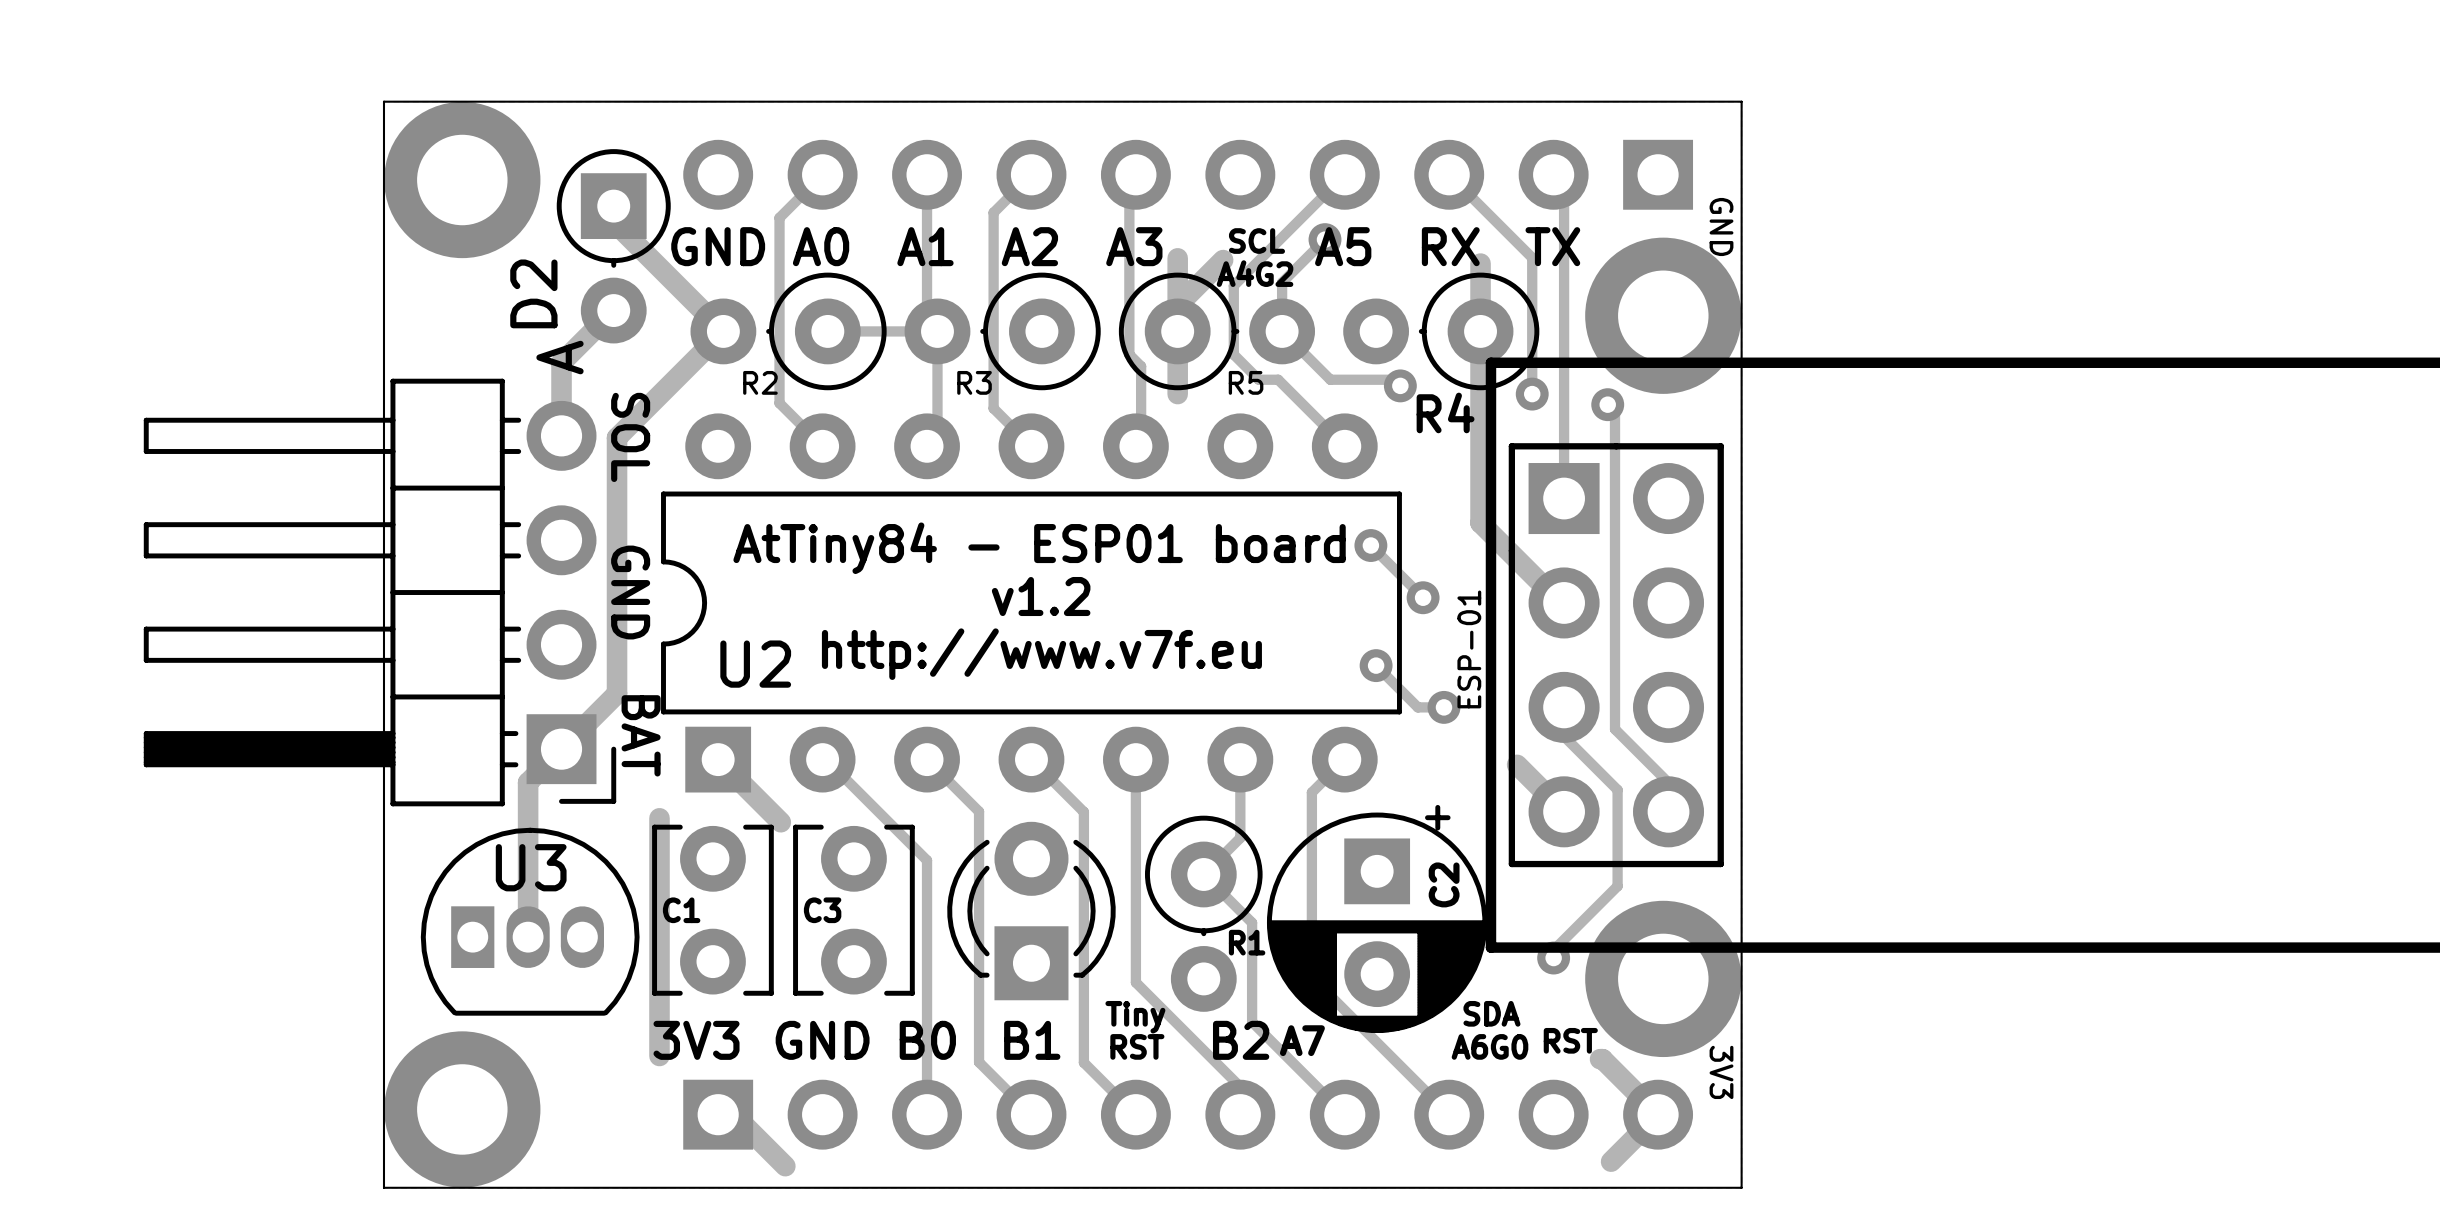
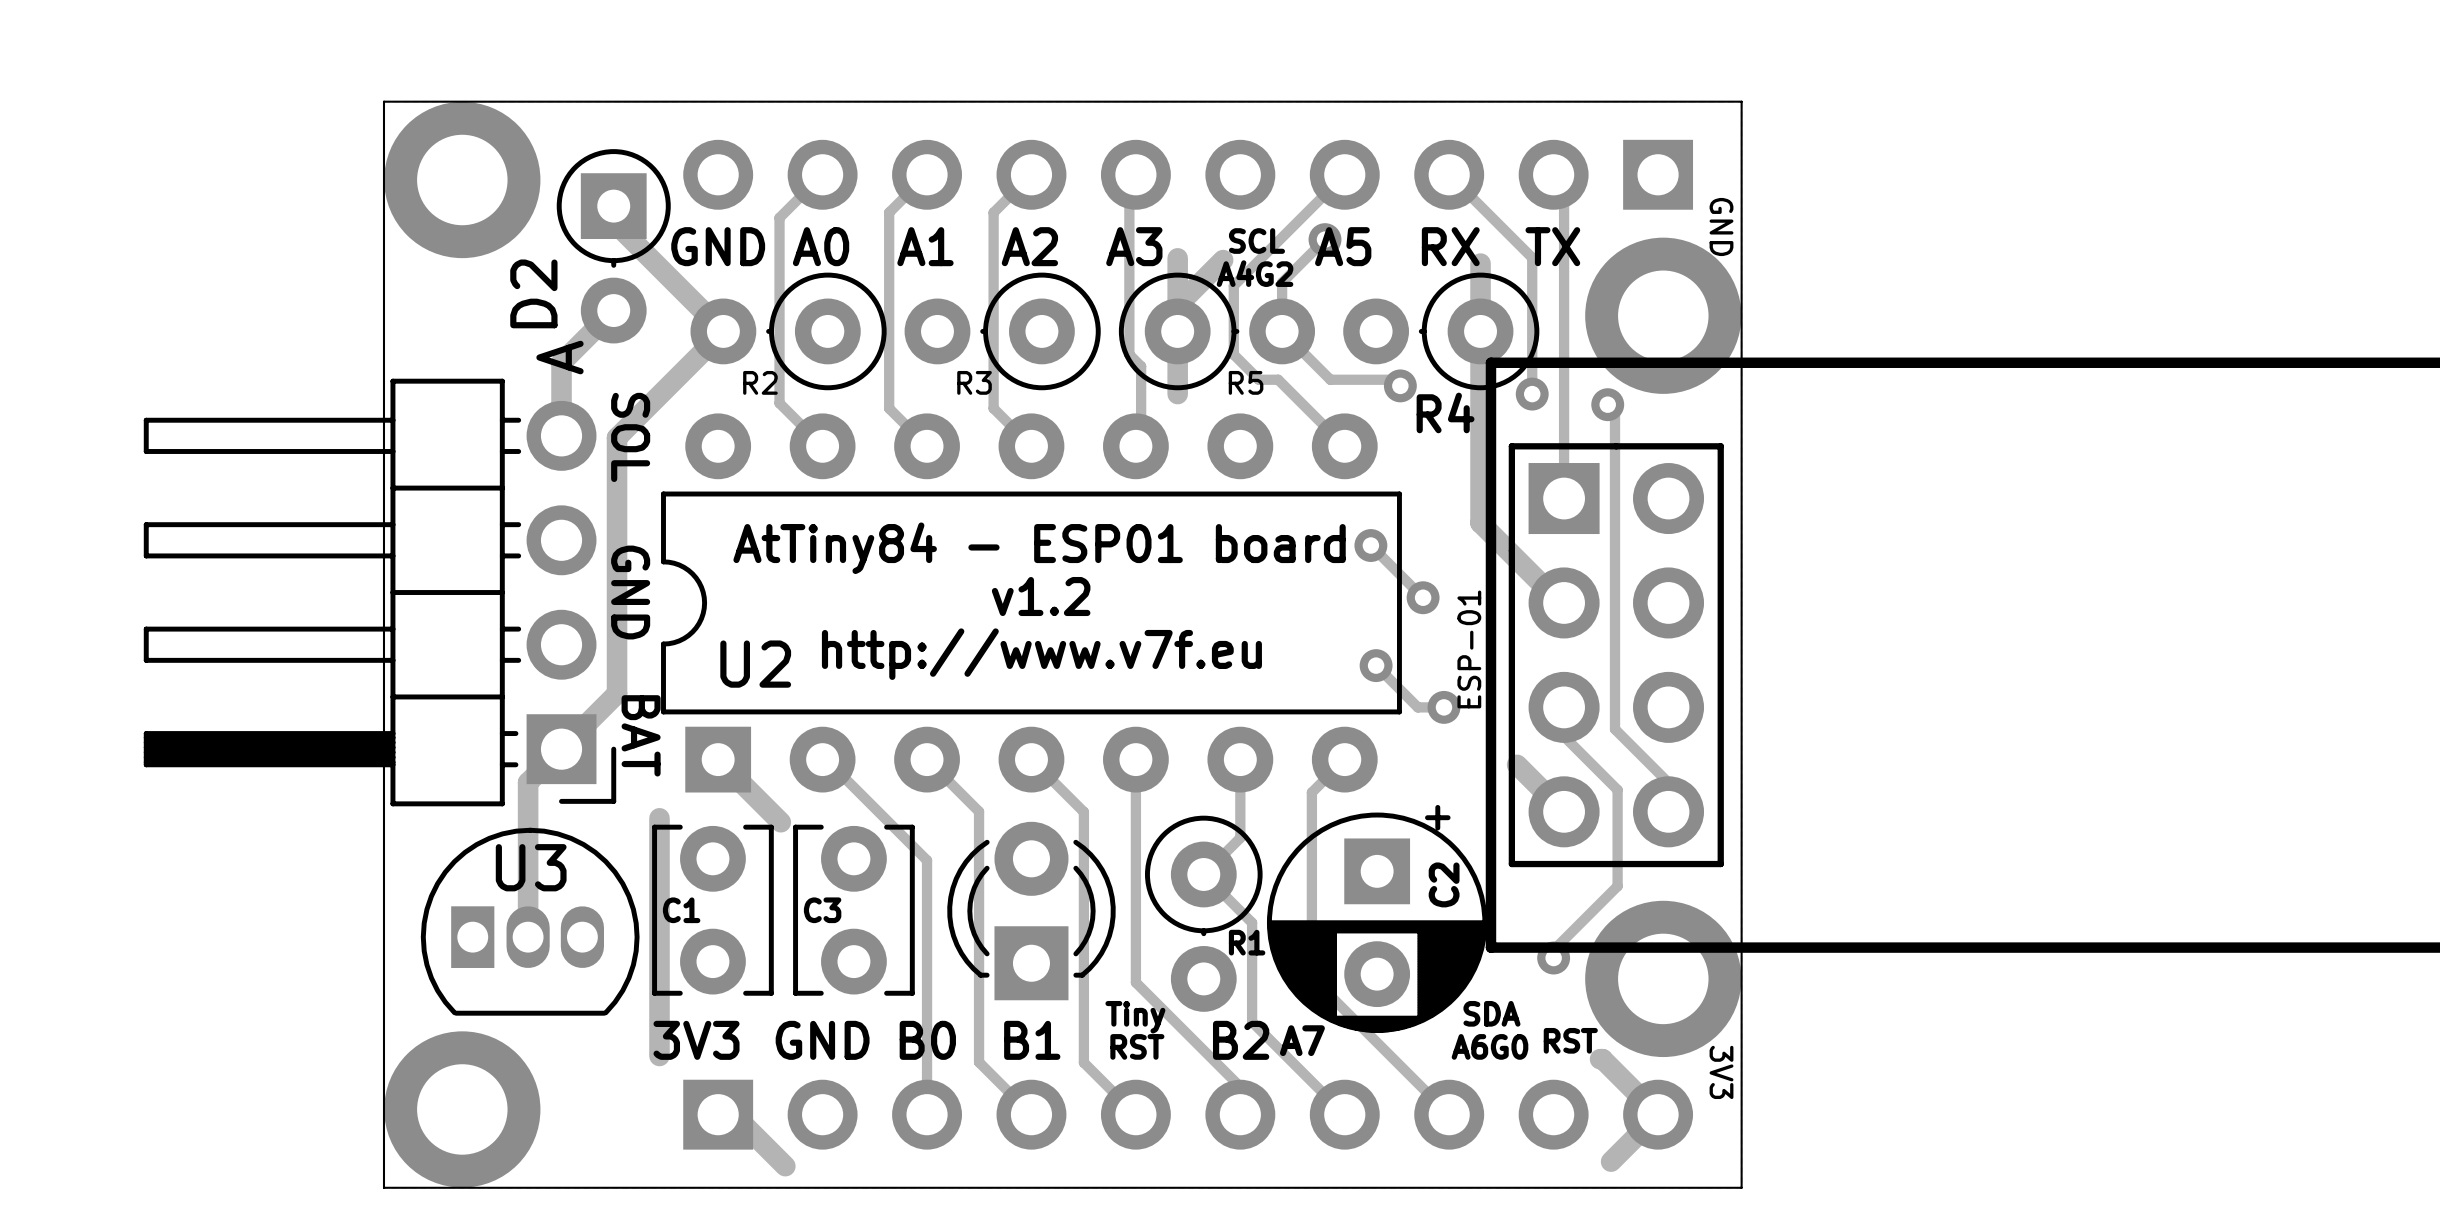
track: (927, 174) (927, 320) -> (927, 174) (889, 212) (889, 408) (927, 446)
track: (827, 331) (937, 331) (937, 435) -> none

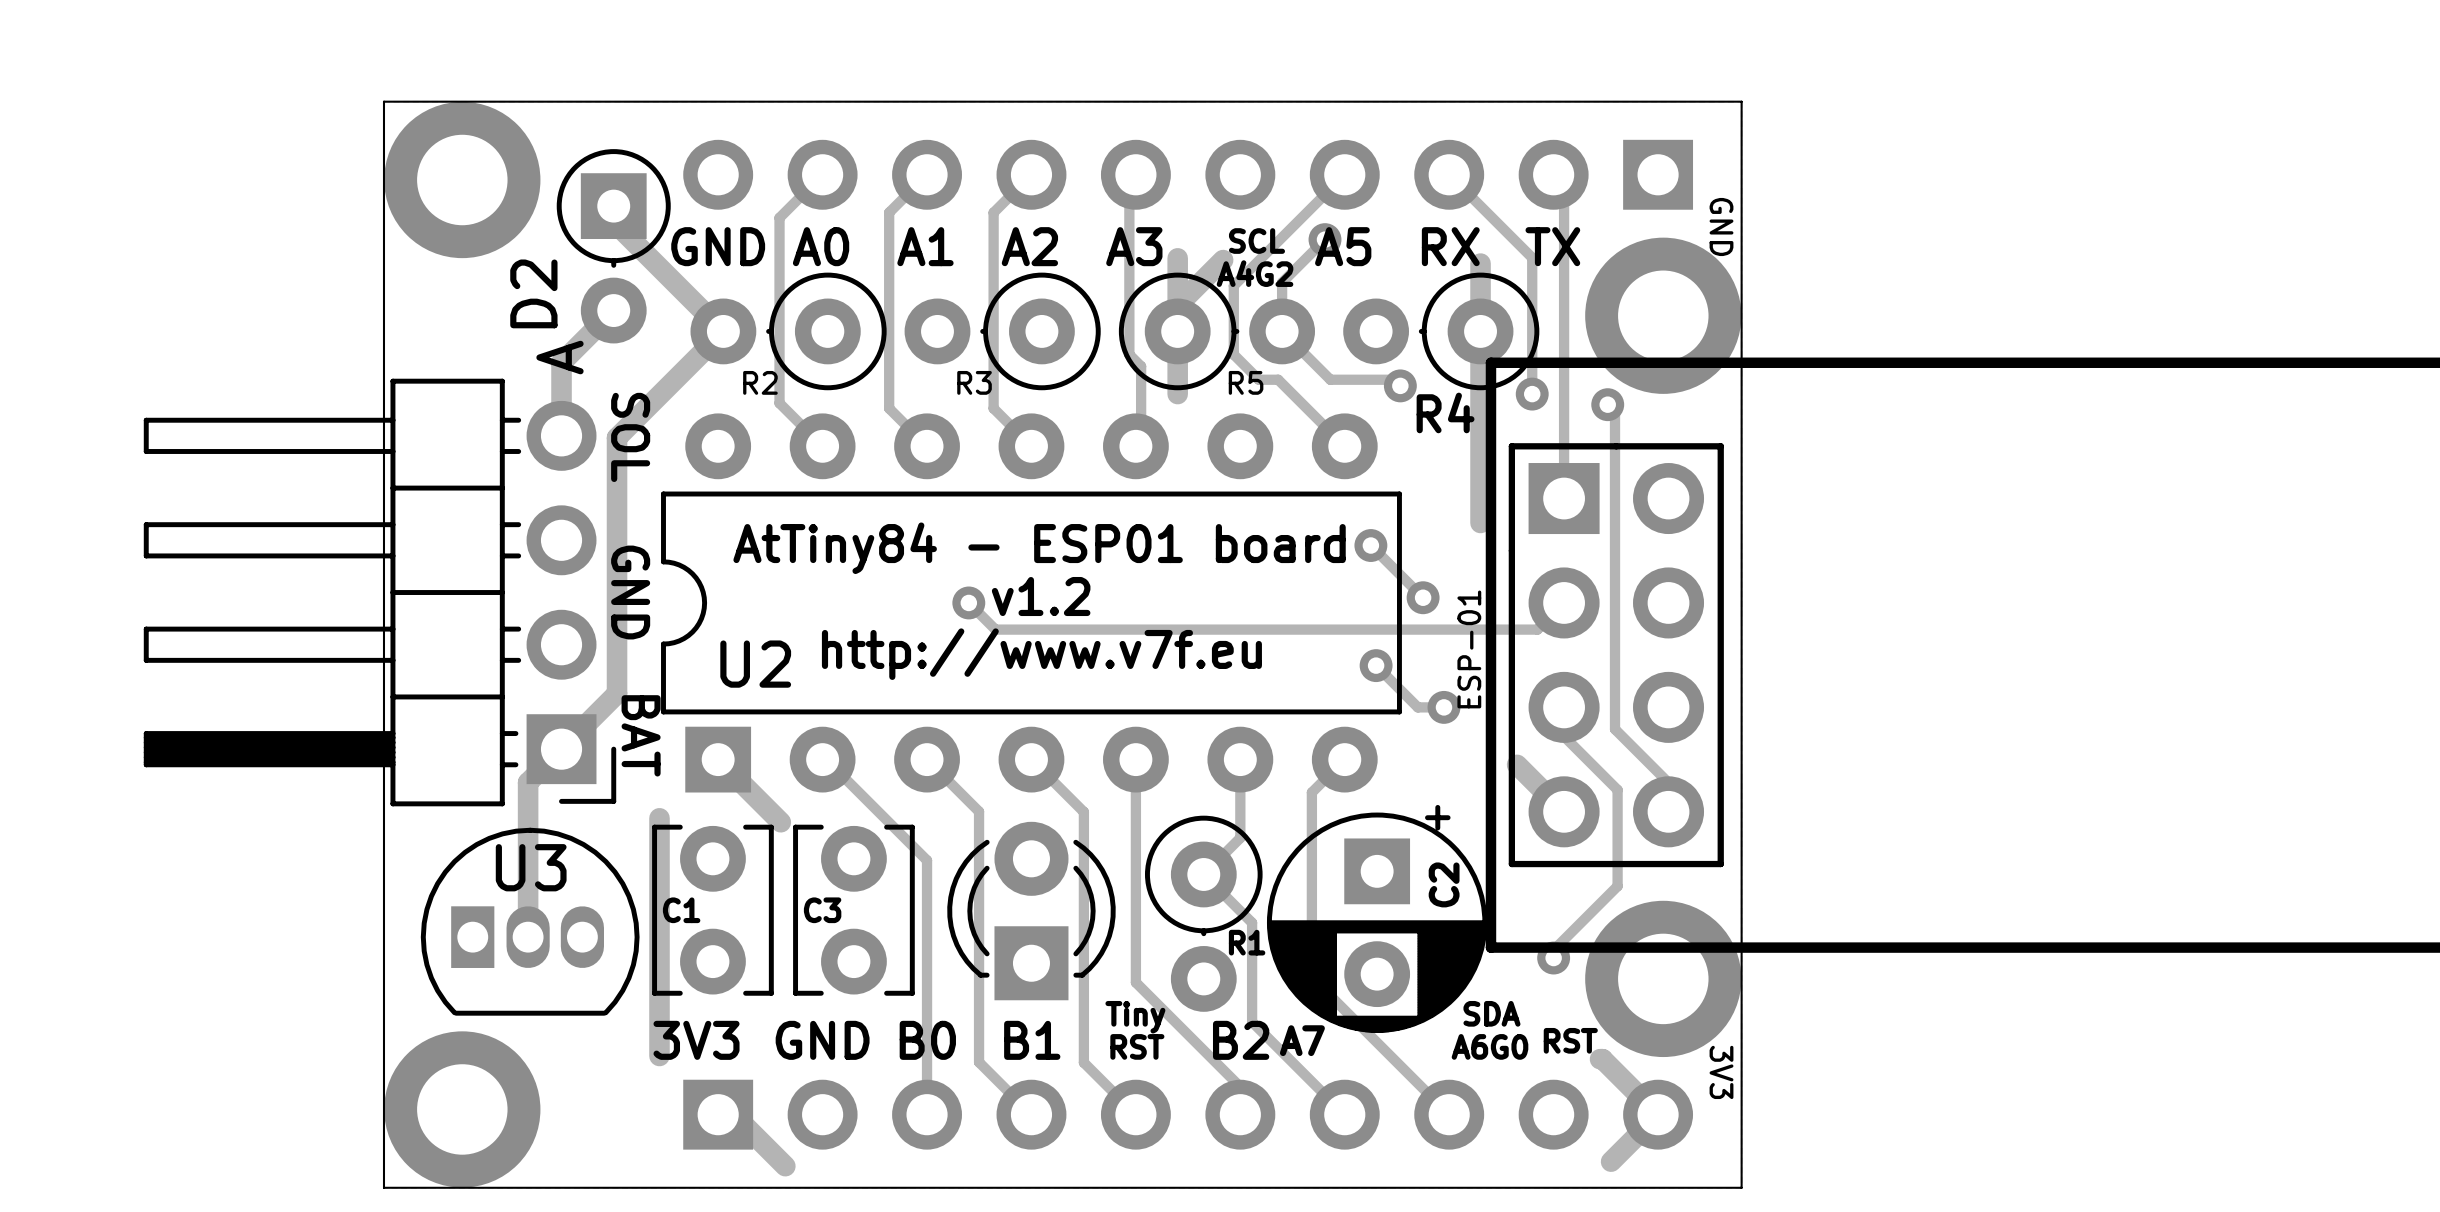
track: (1480, 523) (1560, 602) -> none
track: none -> (968, 602) (995, 629) (1537, 629) (1564, 602)
via: none -> (968, 602)

